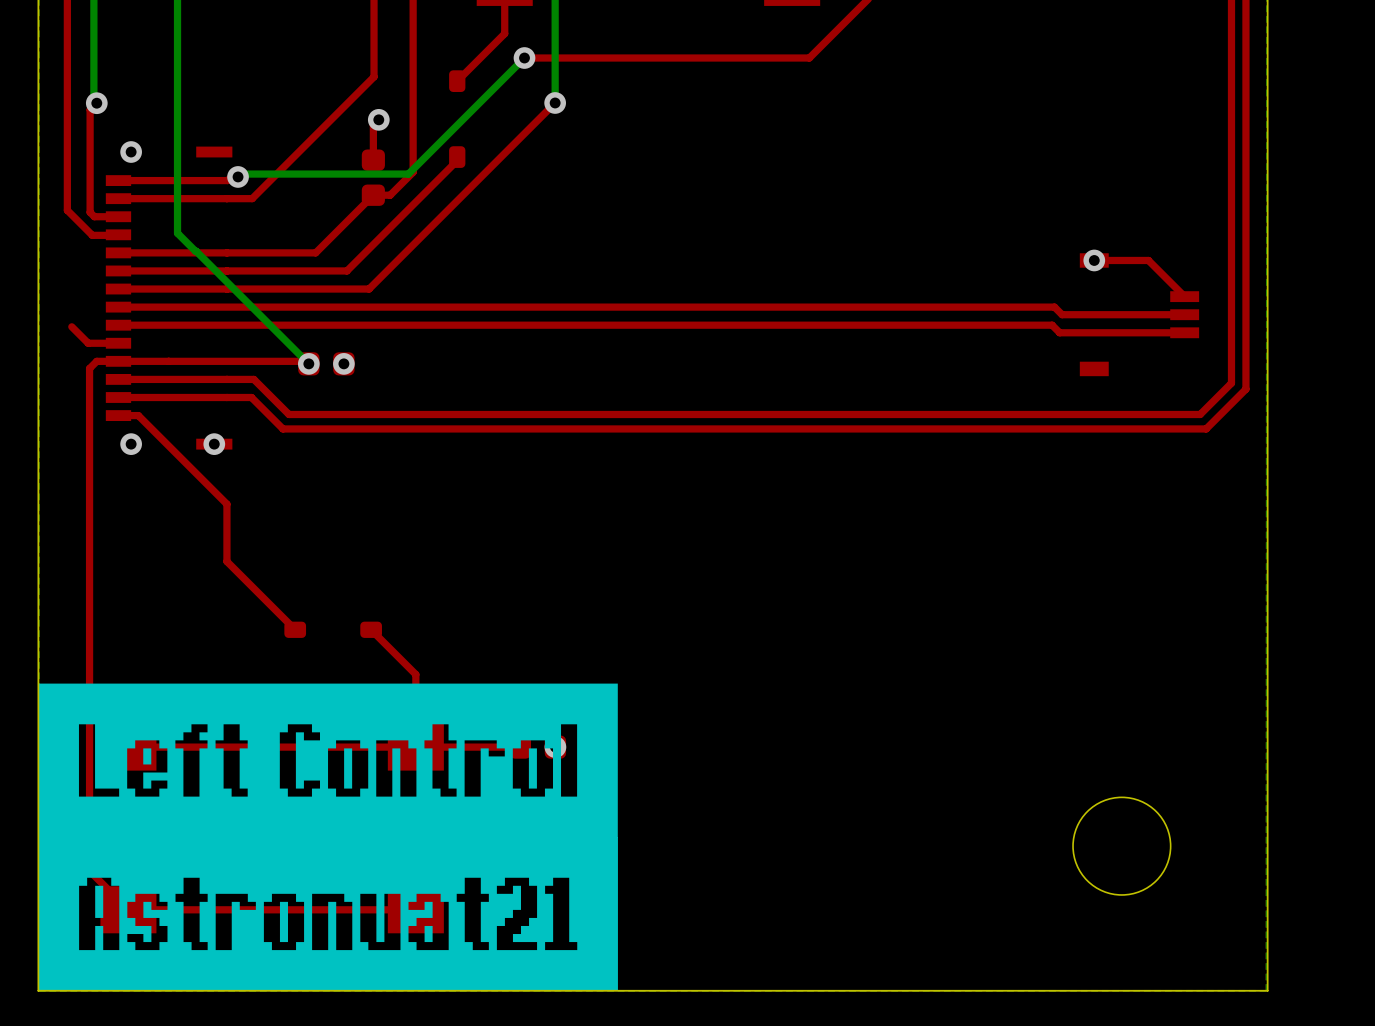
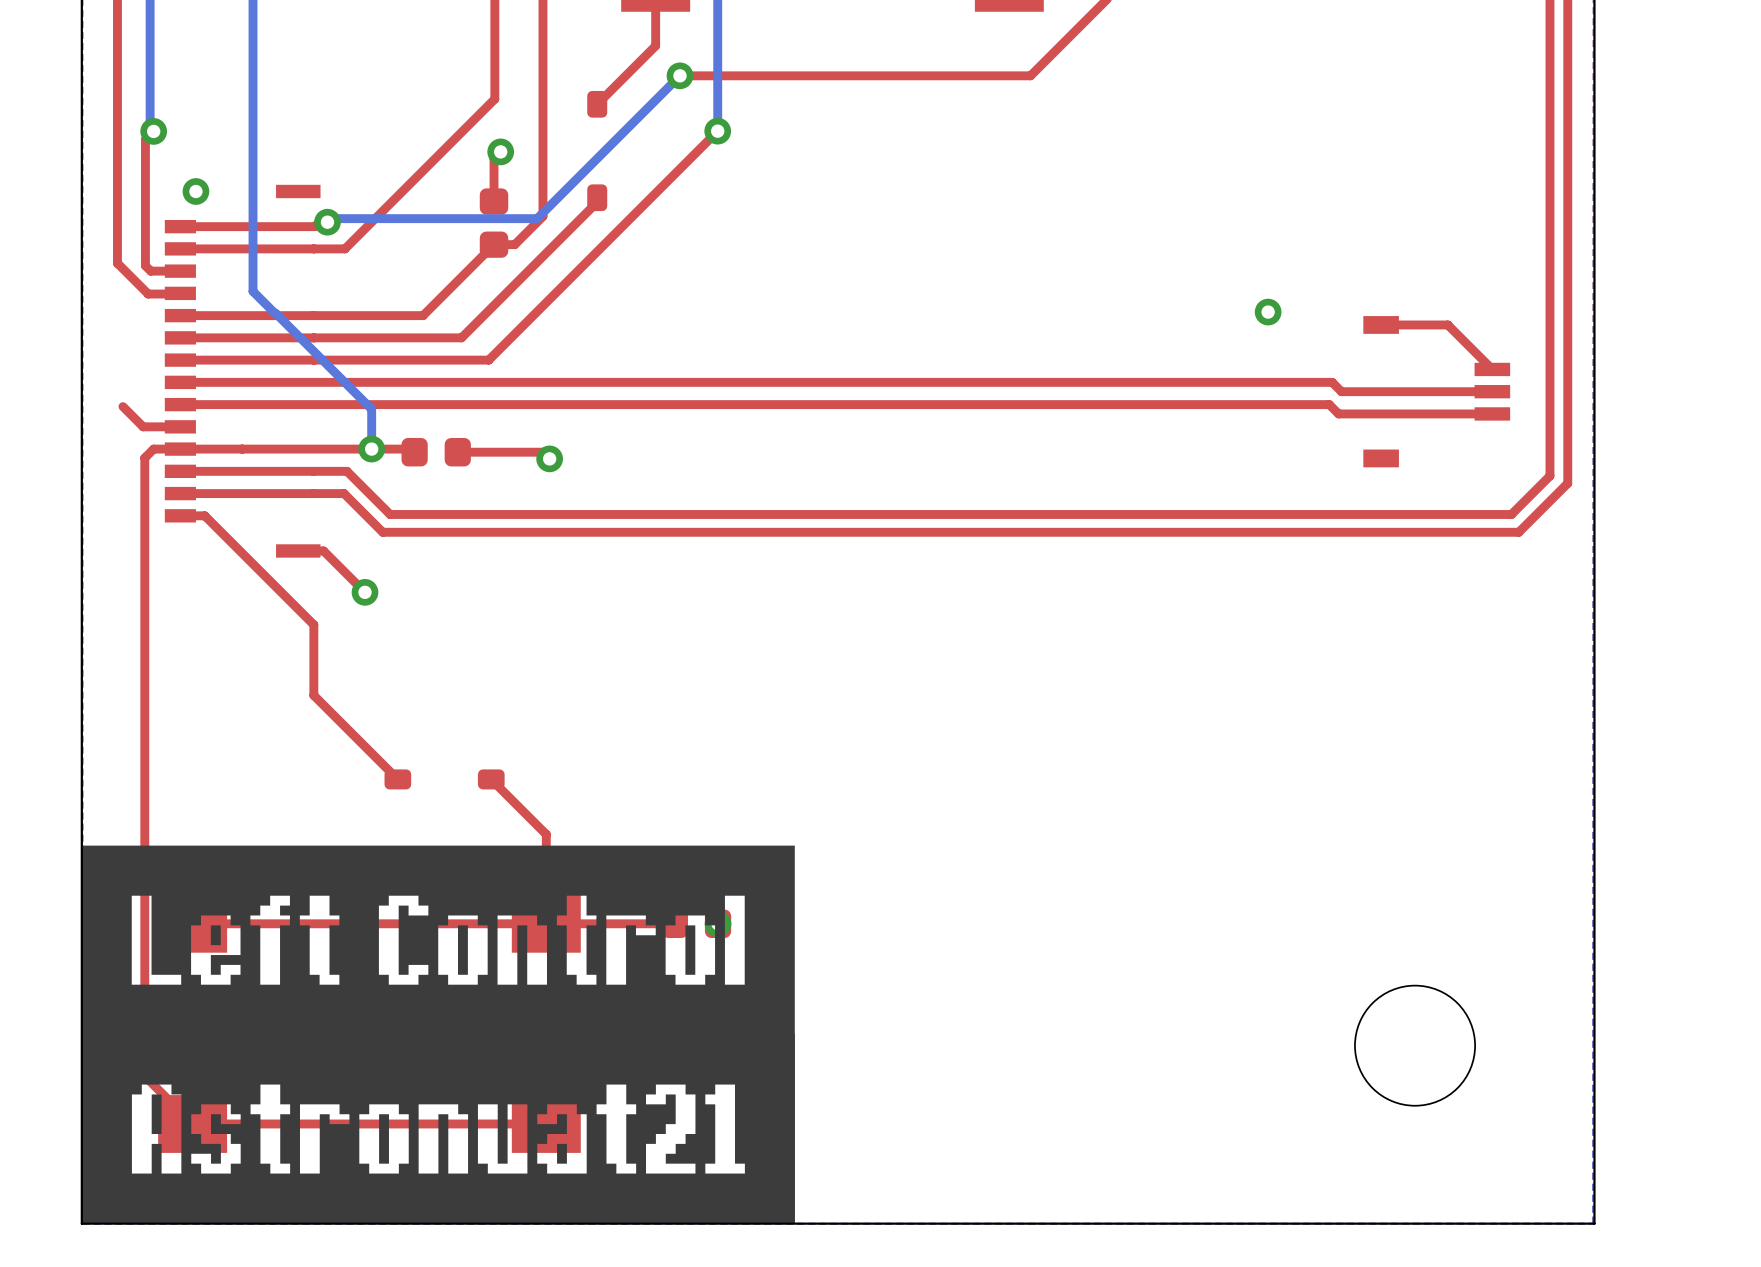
via position: (1094, 260) -> (1268, 312)
bottom track: (273, 328) (308, 363) -> (371, 409) (371, 449)
via: none -> (371, 449)
via: (308, 363) -> none
top track: none -> (457, 452) (542, 452) (549, 458)
via: (343, 363) -> none
via: none -> (549, 458)
via: (131, 444) -> none
top track: none -> (298, 550) (323, 550) (365, 592)
via: (214, 444) -> none
via: none -> (365, 592)

